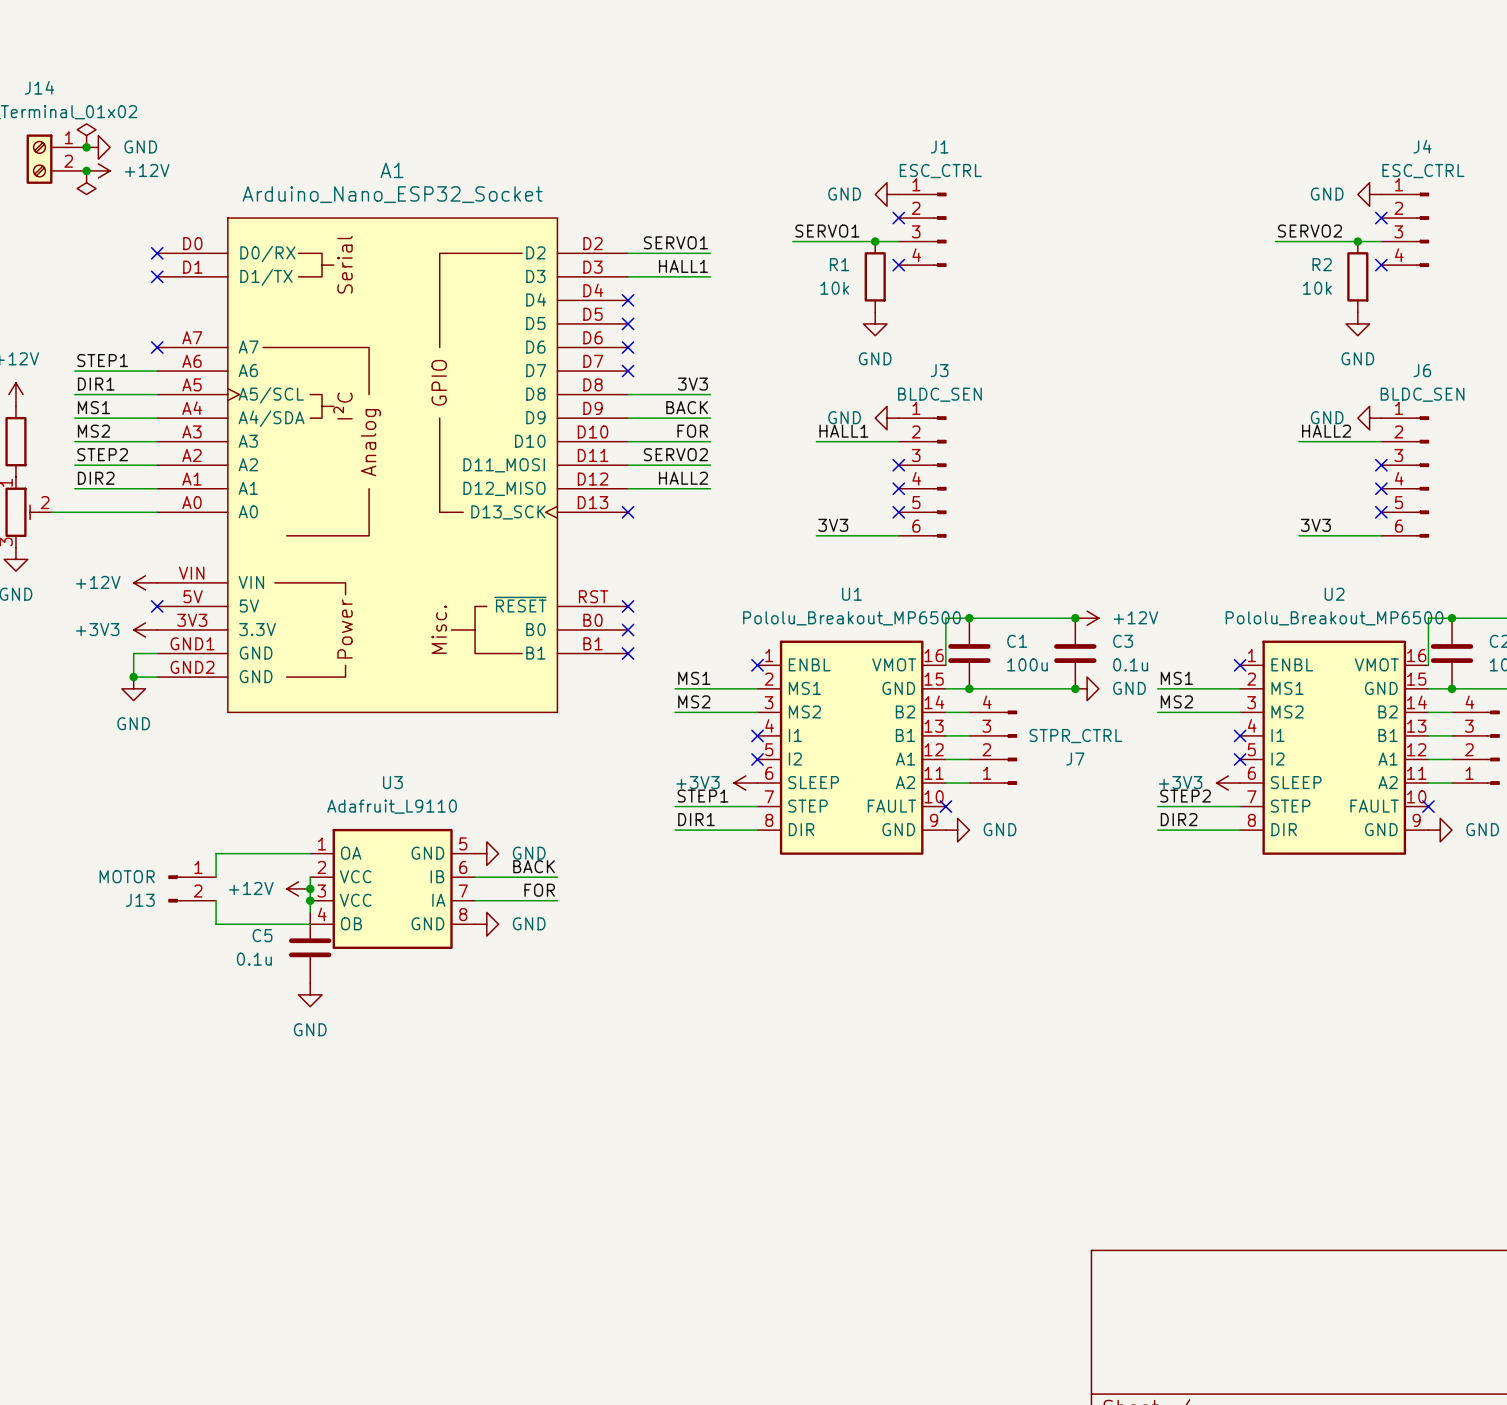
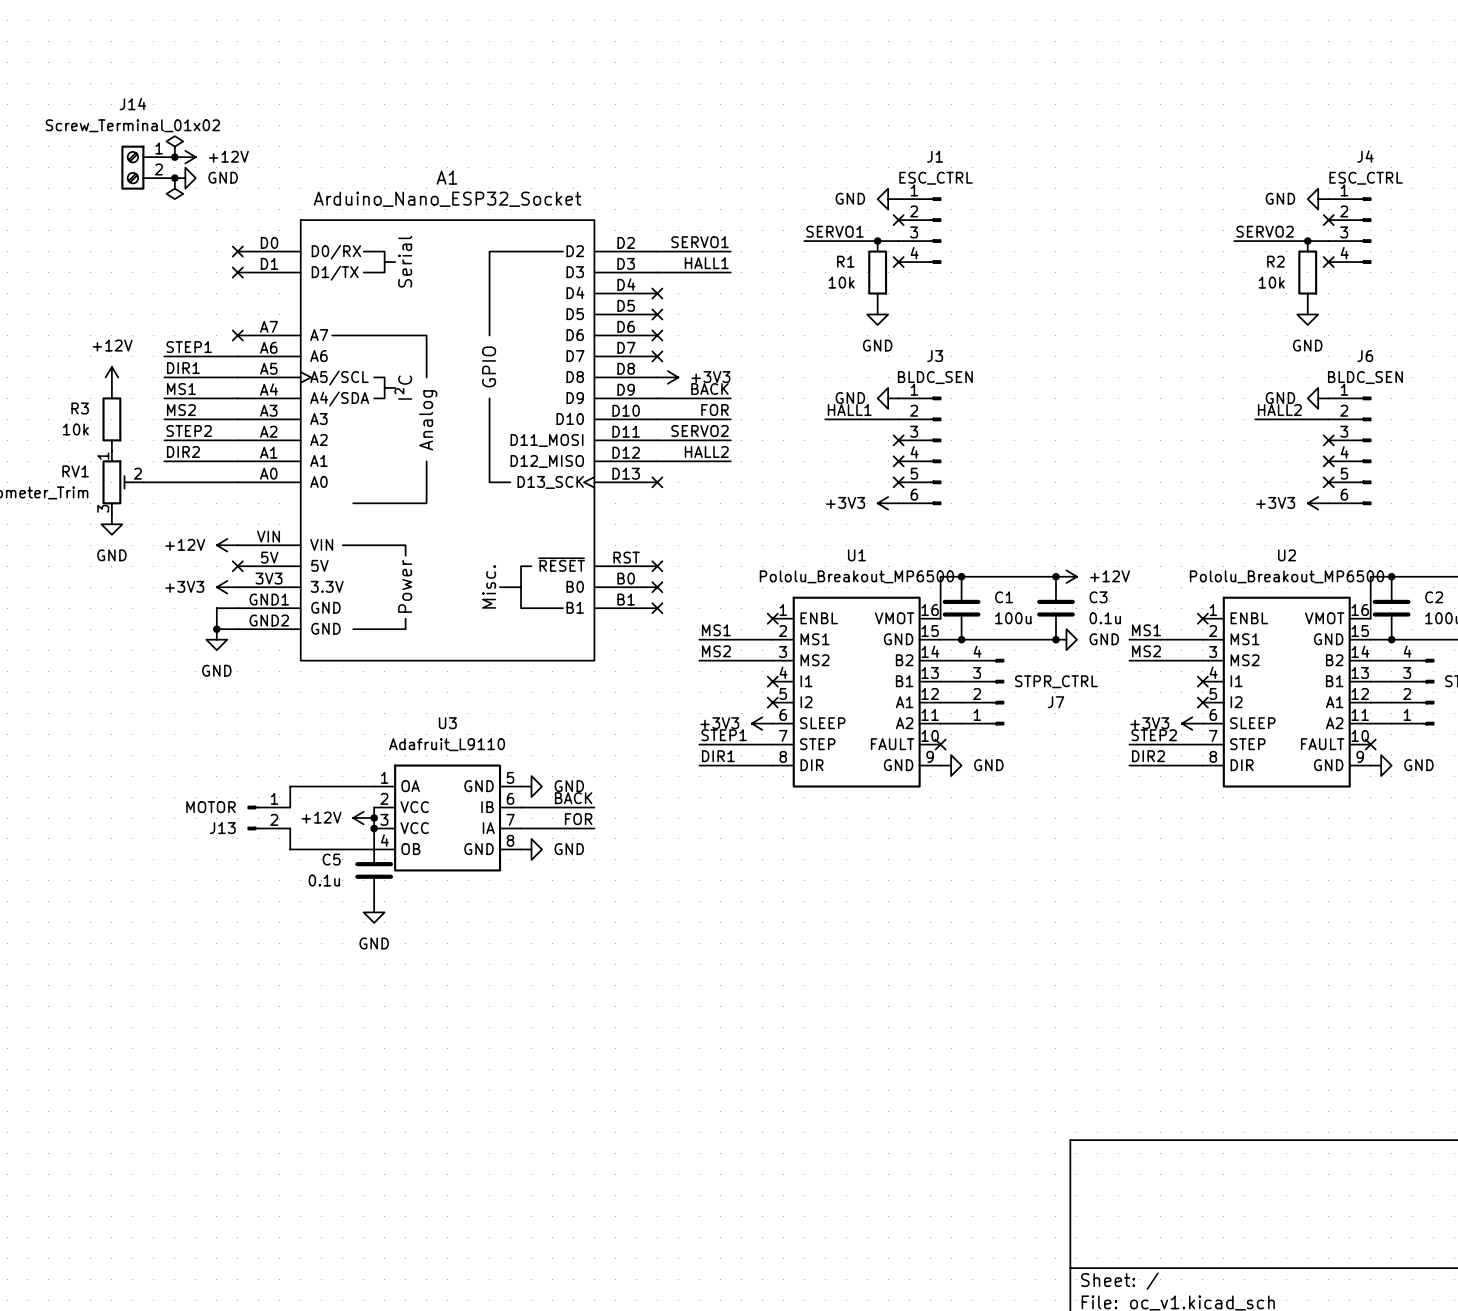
power symbol: GND (98, 147) -> +12V (185, 157)
power symbol: +12V (98, 170) -> GND (185, 178)
label: 3V3 (692, 384) -> none
wire: (628, 394) (710, 394) -> none
power symbol: none -> +3V3 (667, 377)
label: 3V3 (833, 525) -> none
label: 3V3 (1315, 525) -> none
wire: (816, 535) (898, 535) -> none
power symbol: none -> +3V3 (888, 503)
wire: (1298, 535) (1381, 535) -> none
power symbol: none -> +3V3 (1318, 503)

